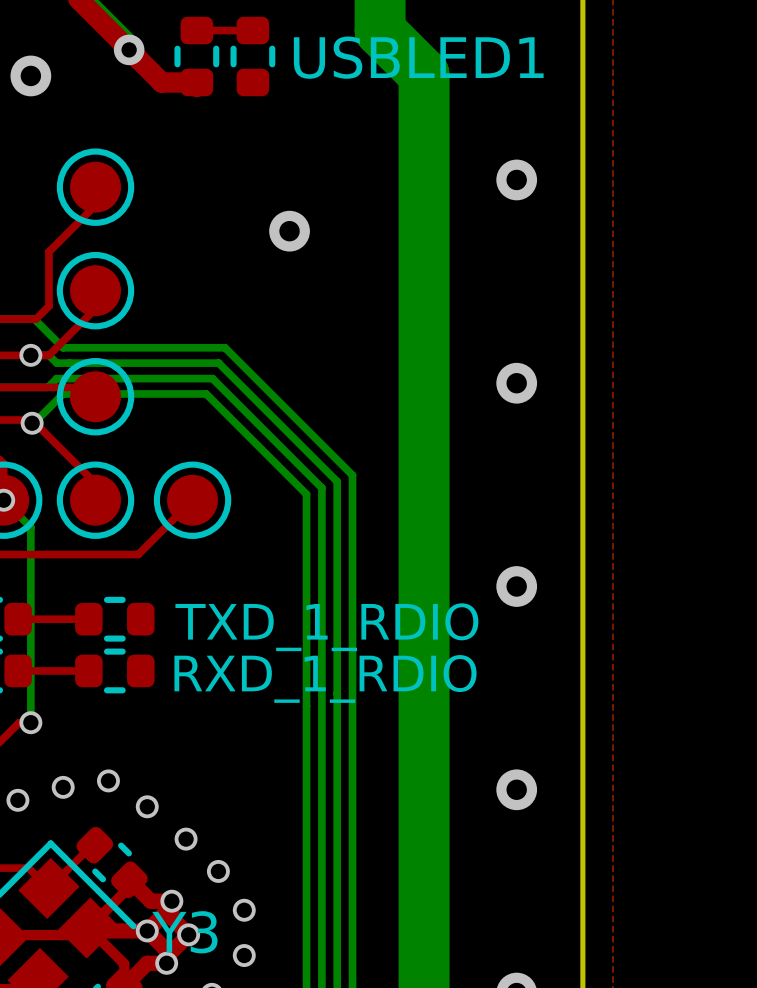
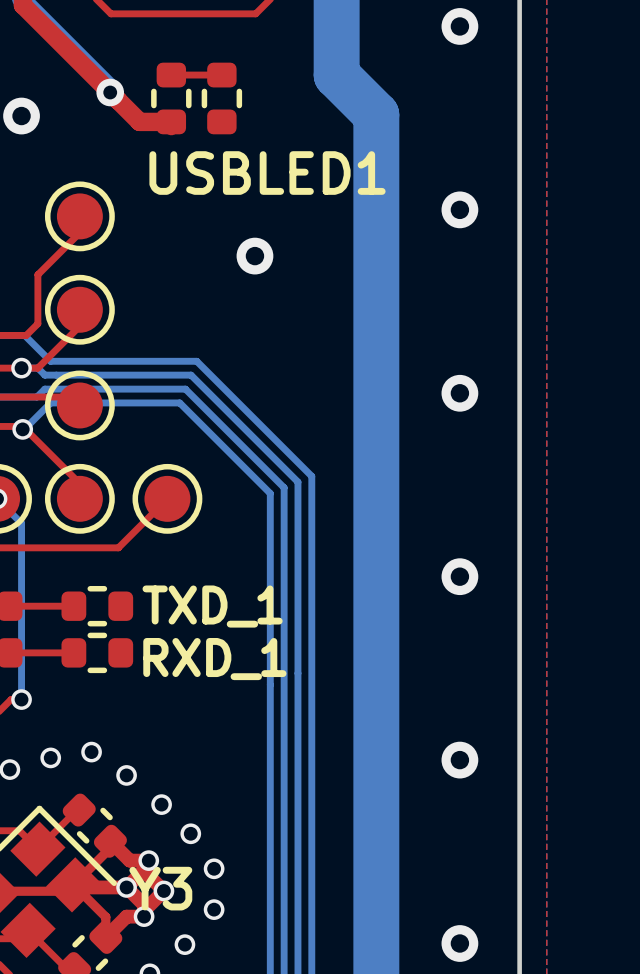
USBLED1 name position: USBLED1 (418, 57) -> USBLED1 (267, 173)
TXD_1_RDIO name: TXD_1_RDIO (326, 627) -> TXD_1 (212, 606)
RXD_1_RDIO name: RXD_1_RDIO (325, 678) -> RXD_1 (214, 659)

